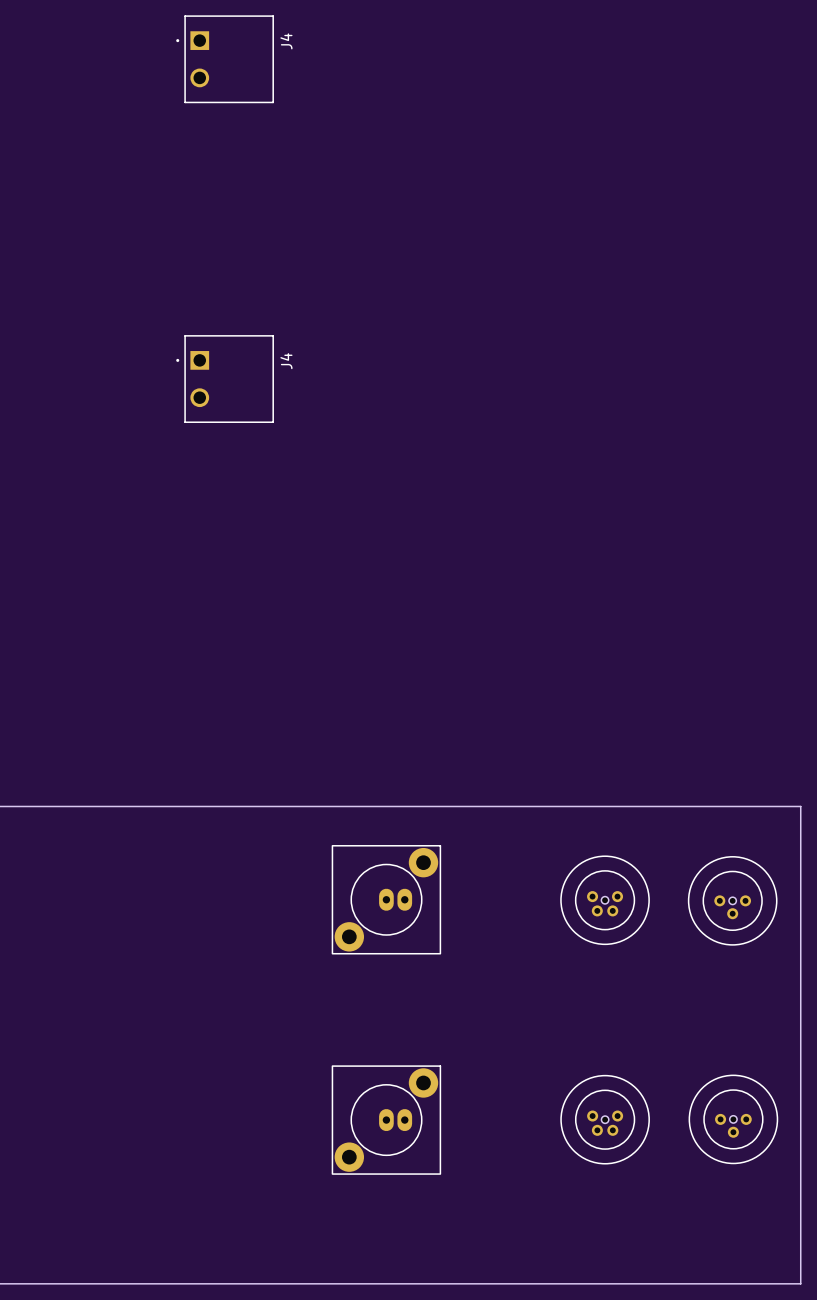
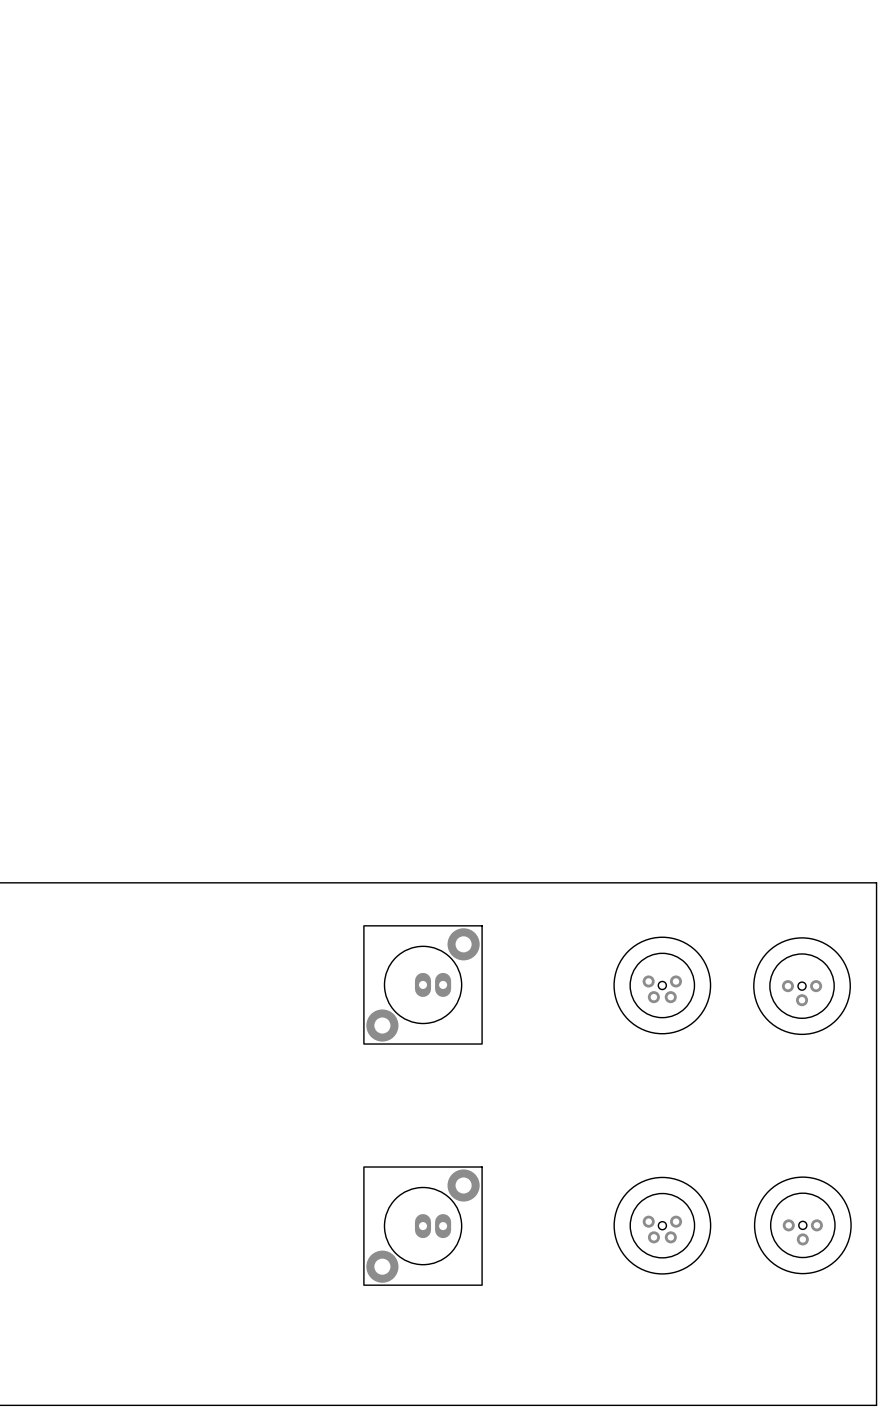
J4: (224, 59) -> none
J4: (224, 379) -> none

